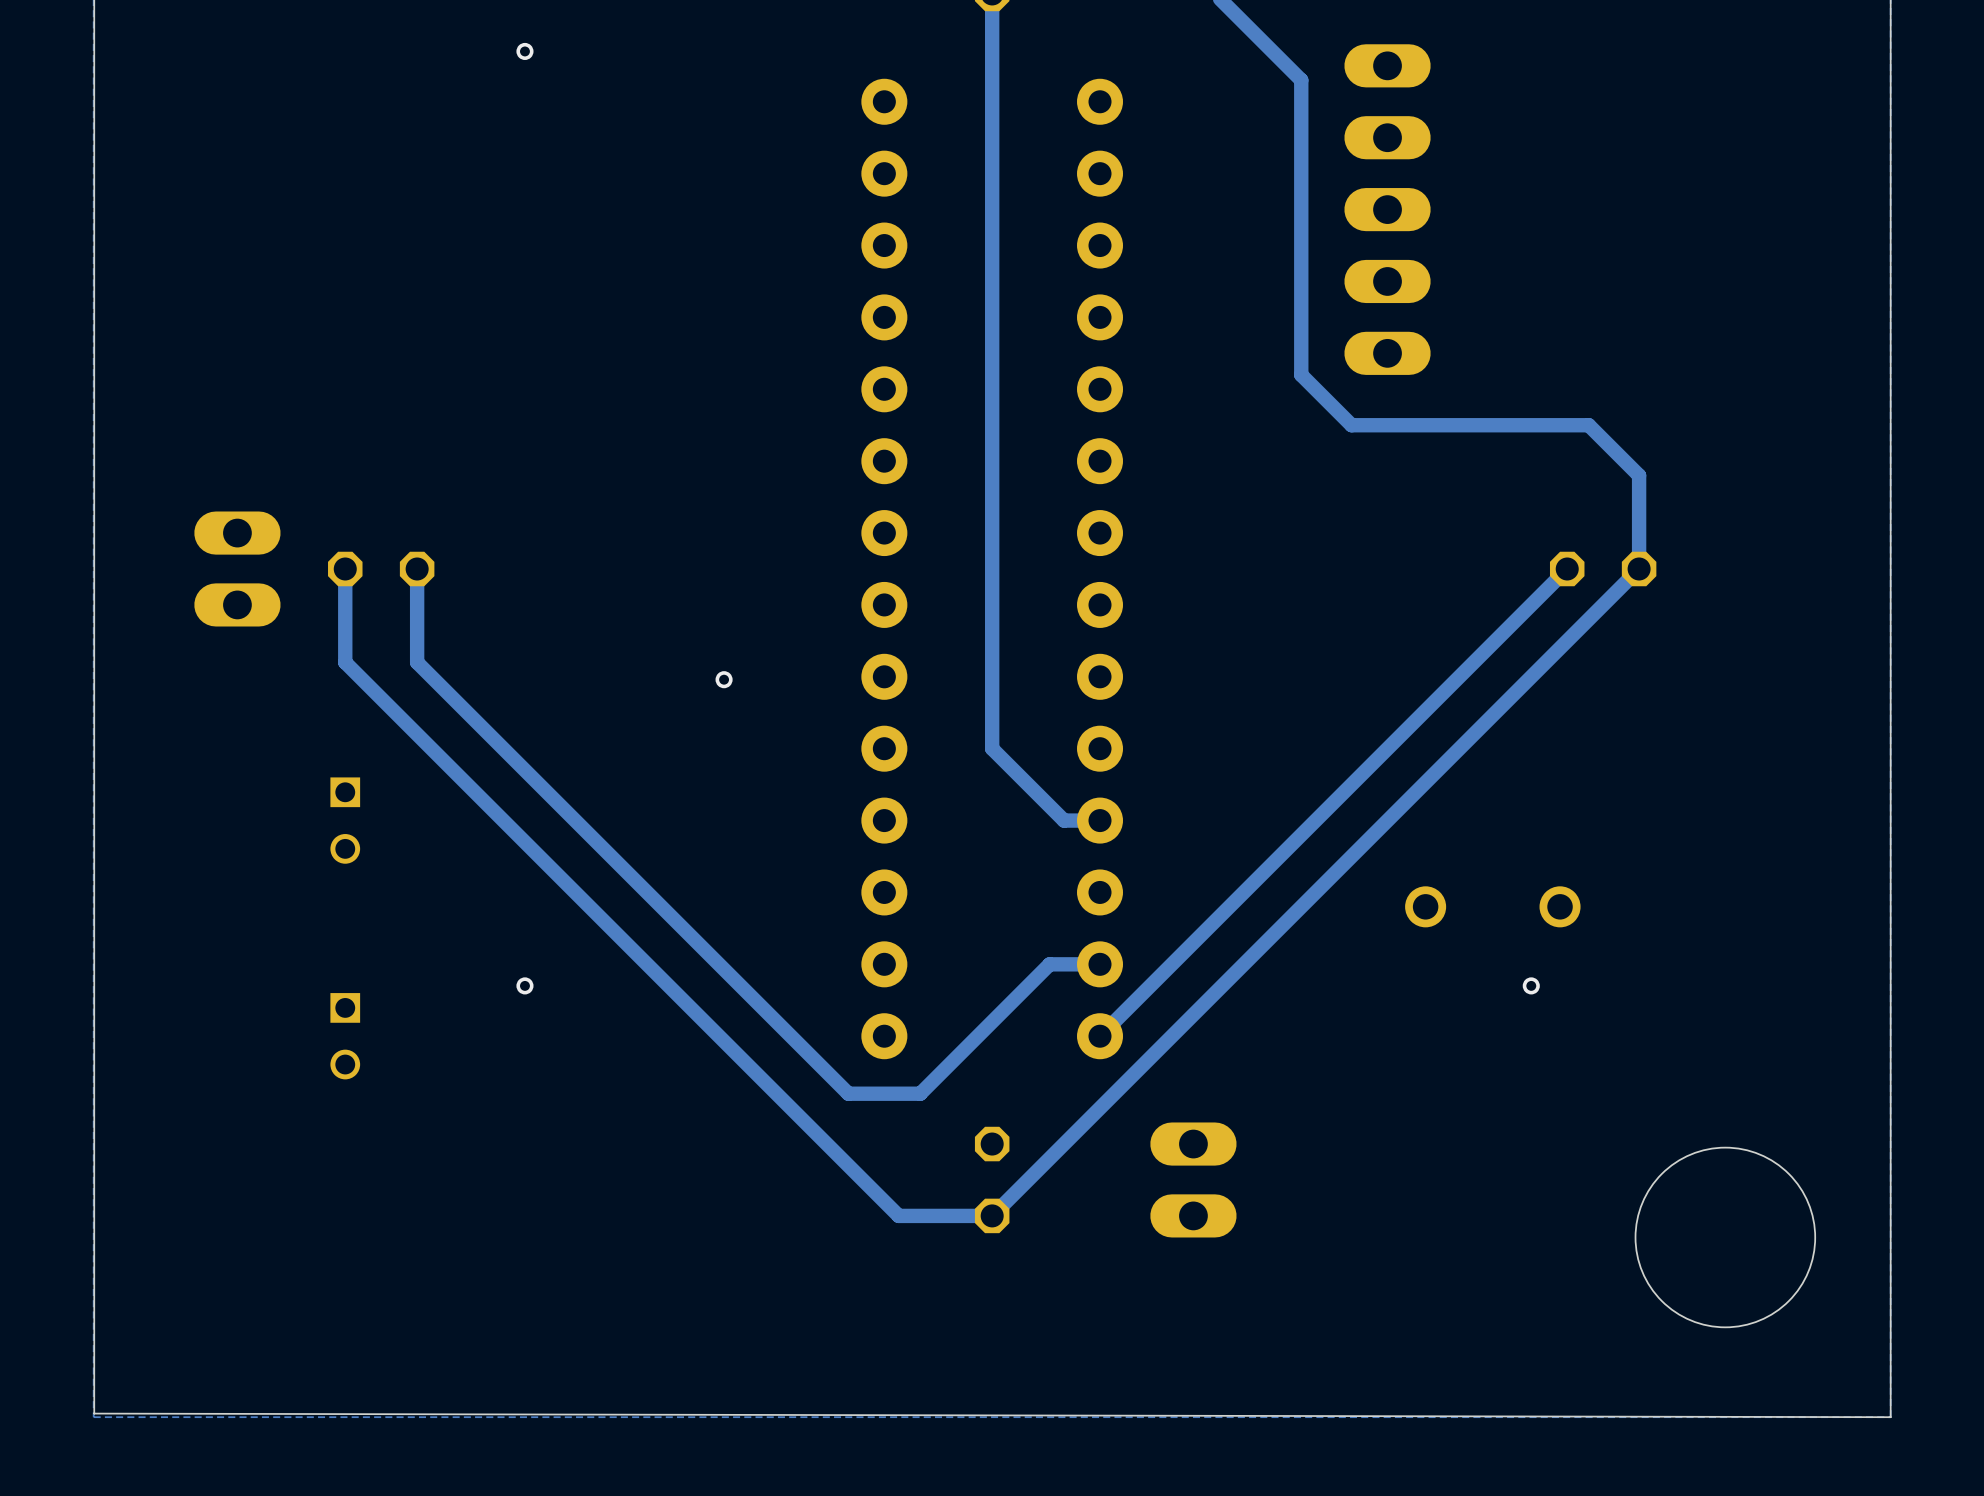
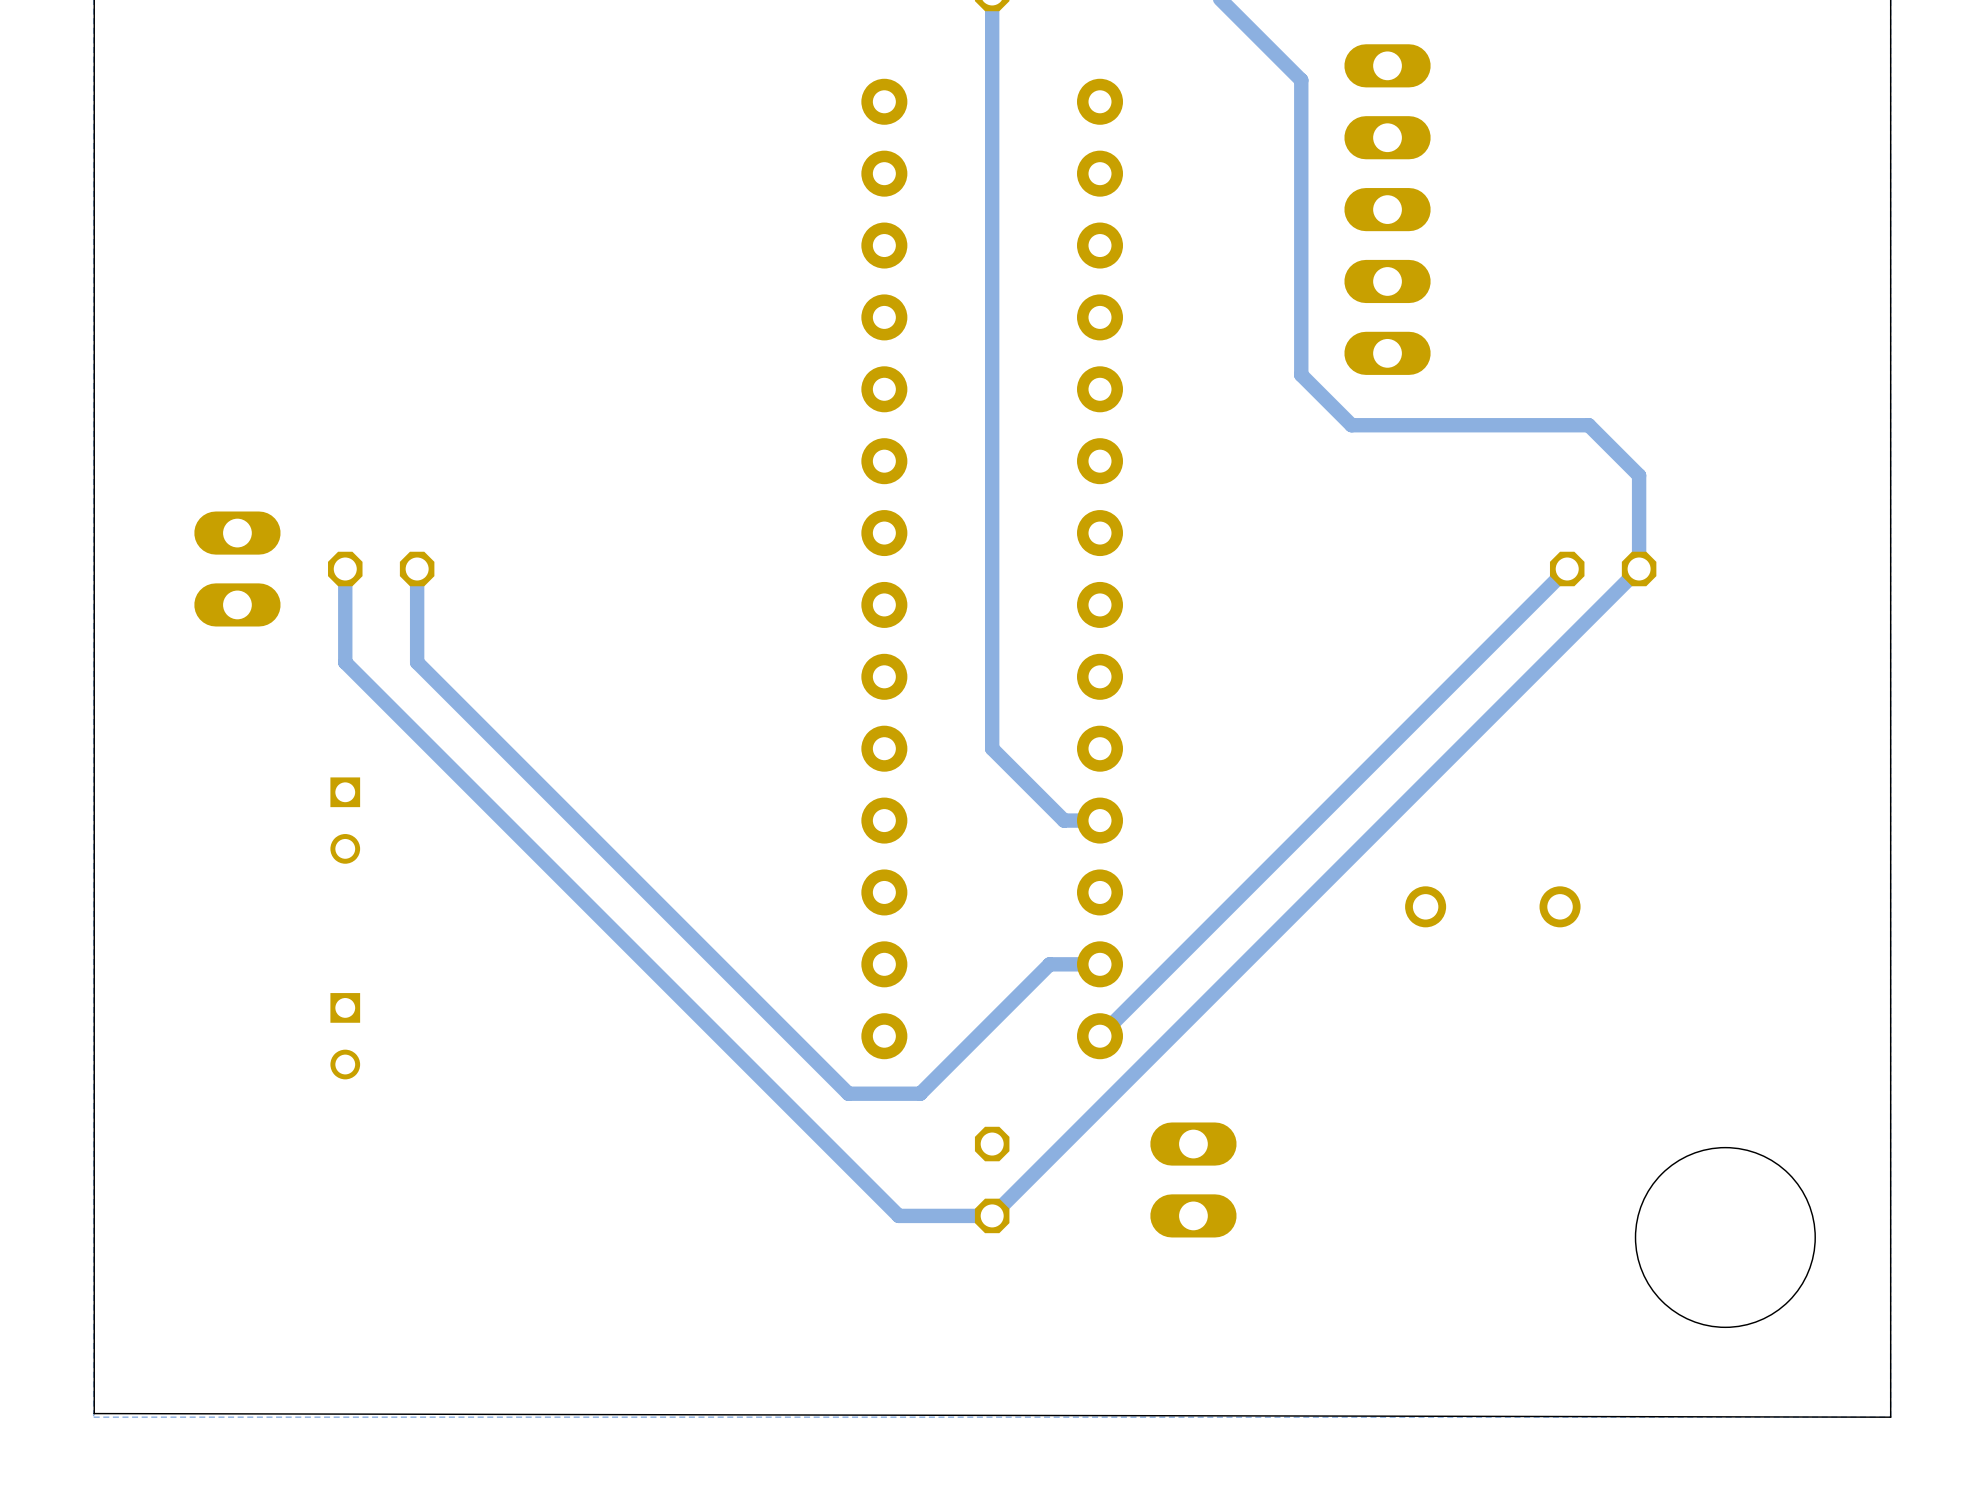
via: (524, 51) -> none
via: (724, 679) -> none
via: (524, 985) -> none
via: (1531, 985) -> none

